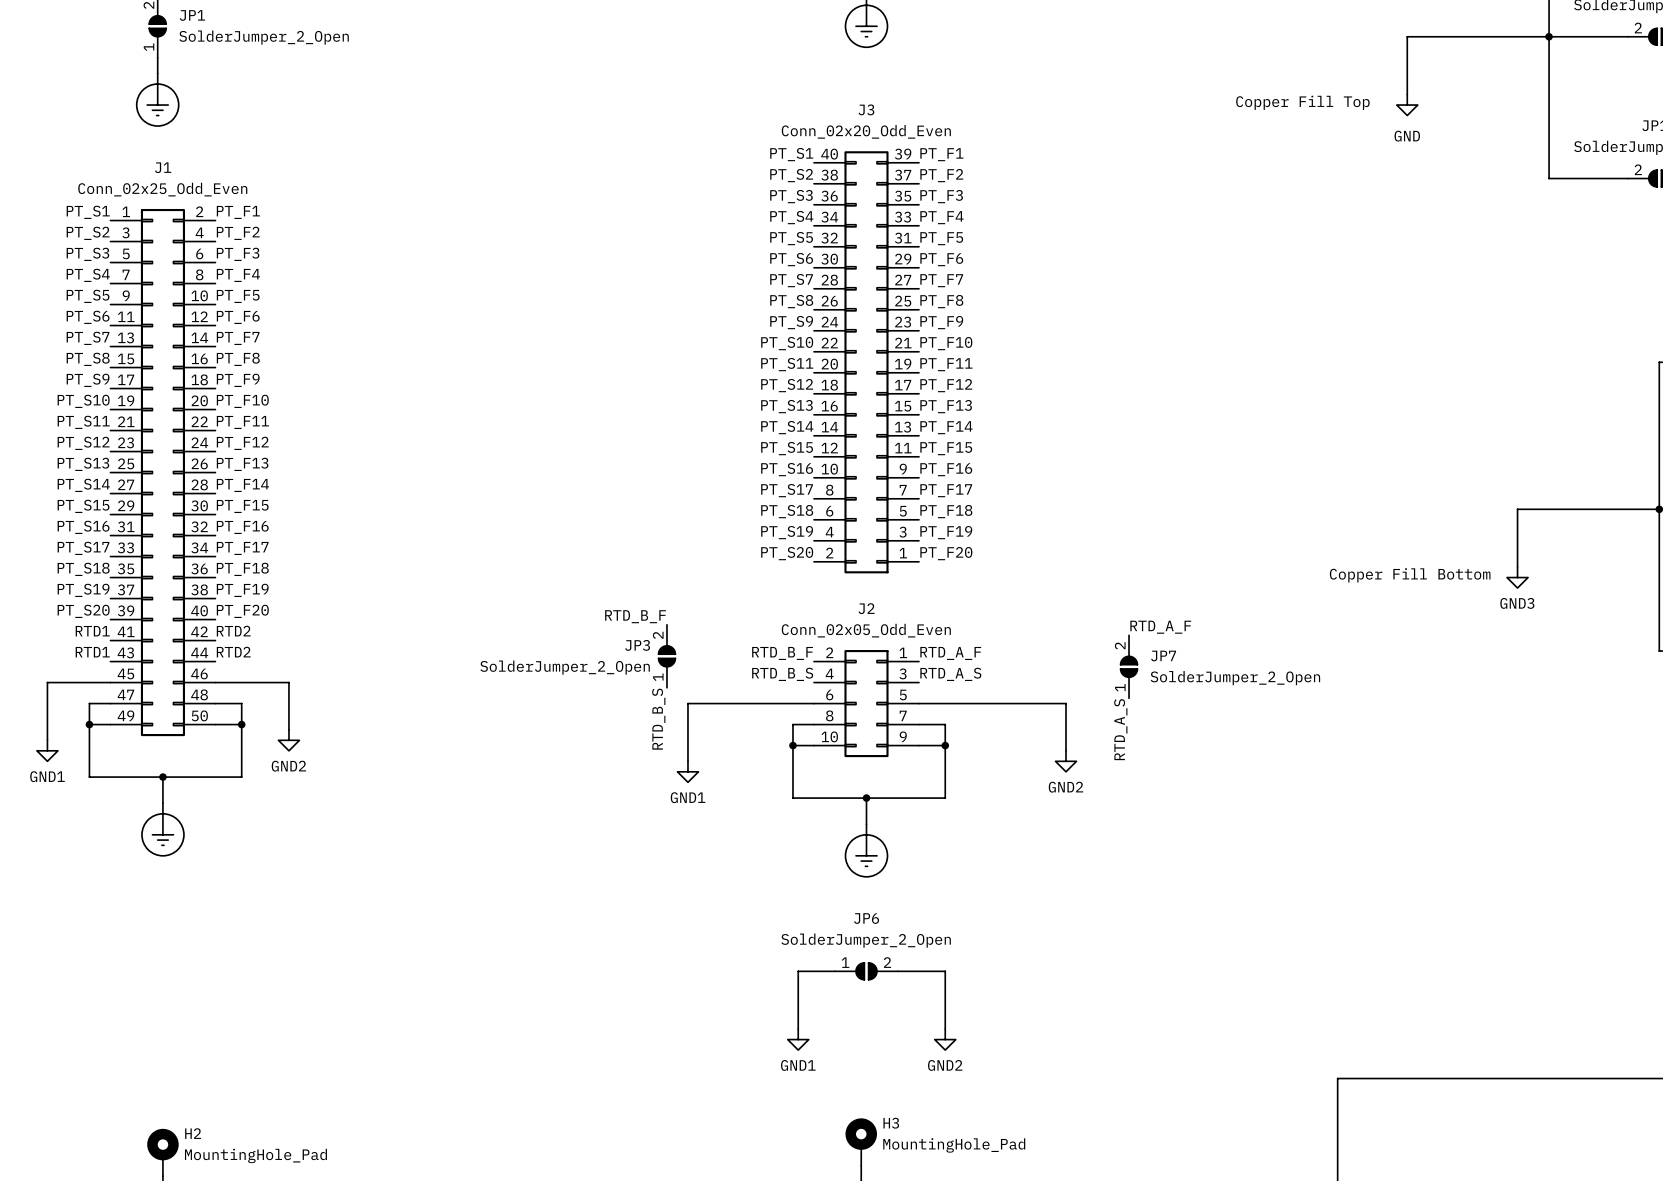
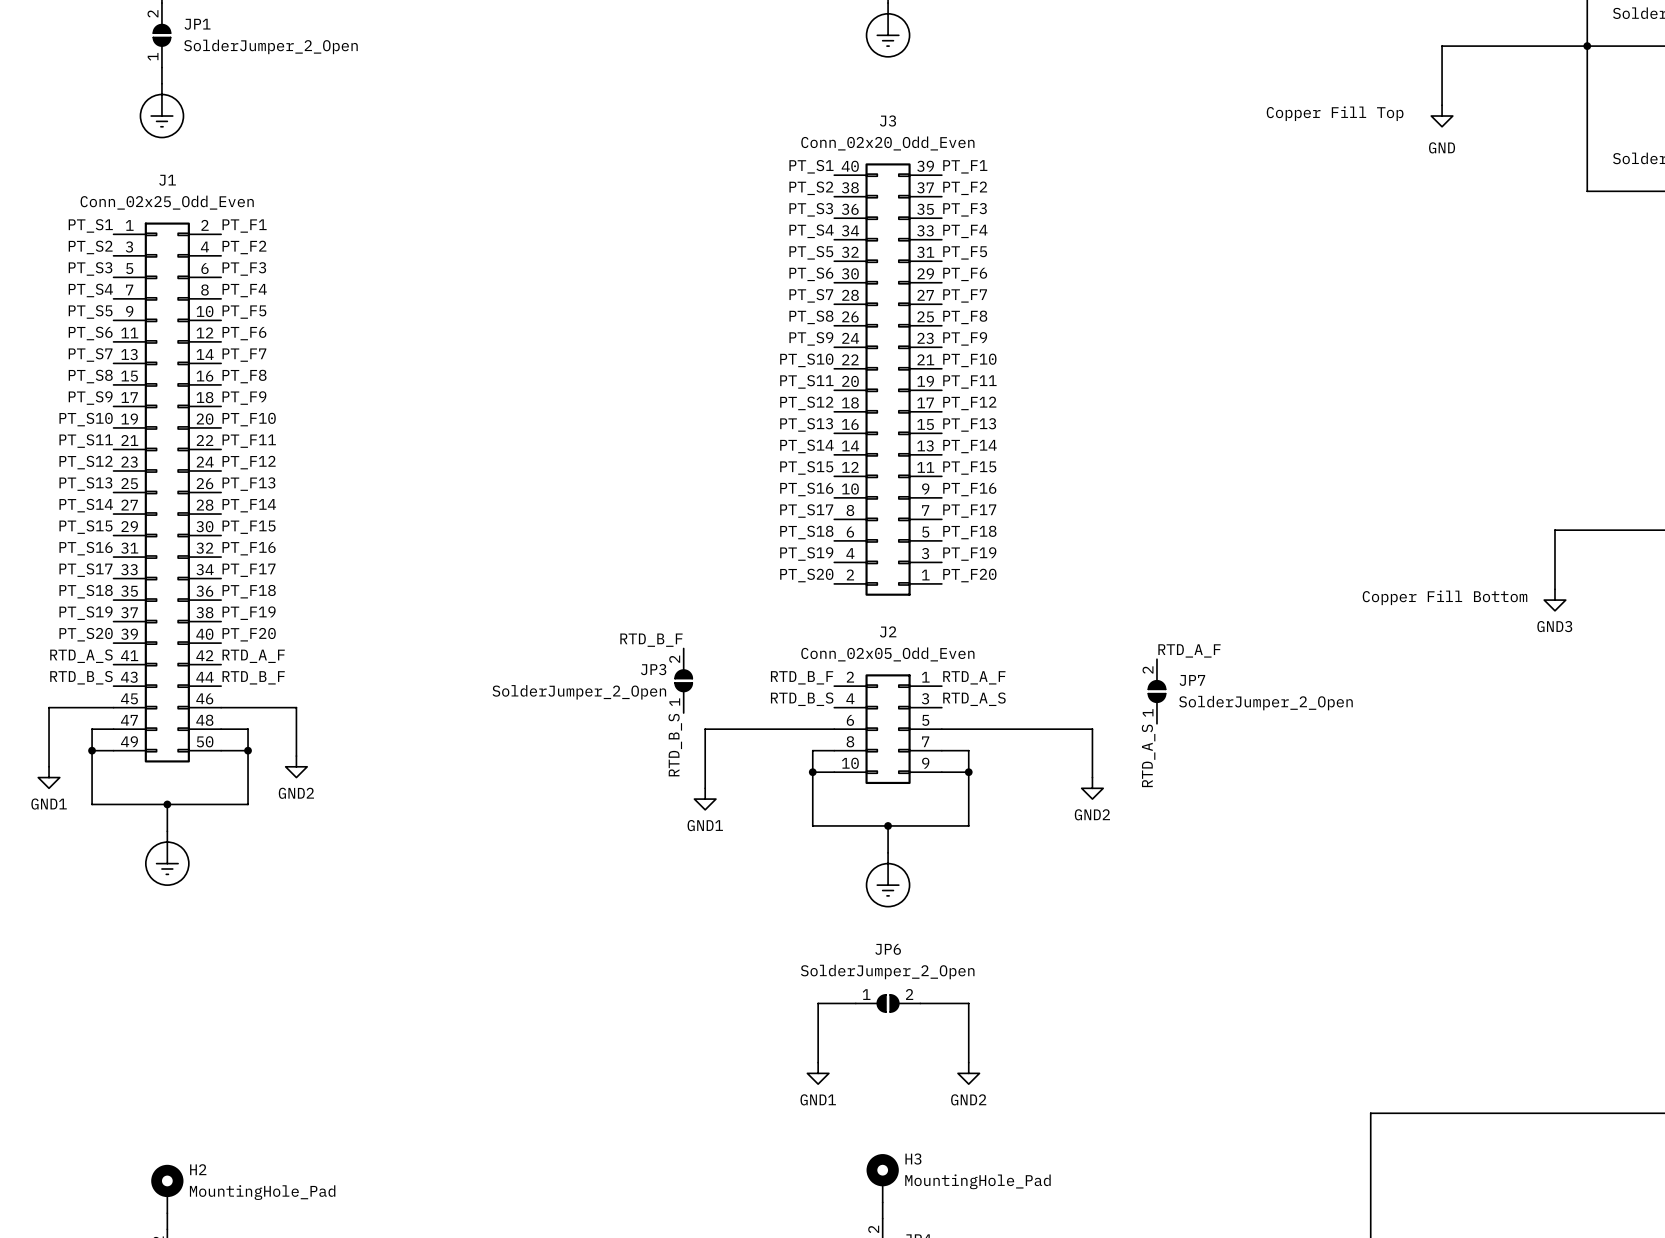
label: RTD1 (92, 631) -> RTD_A_S (81, 656)
label: RTD2 (233, 631) -> RTD_A_F (253, 656)
label: RTD1 (92, 652) -> RTD_B_S (81, 677)
label: RTD2 (233, 652) -> RTD_B_F (253, 677)

